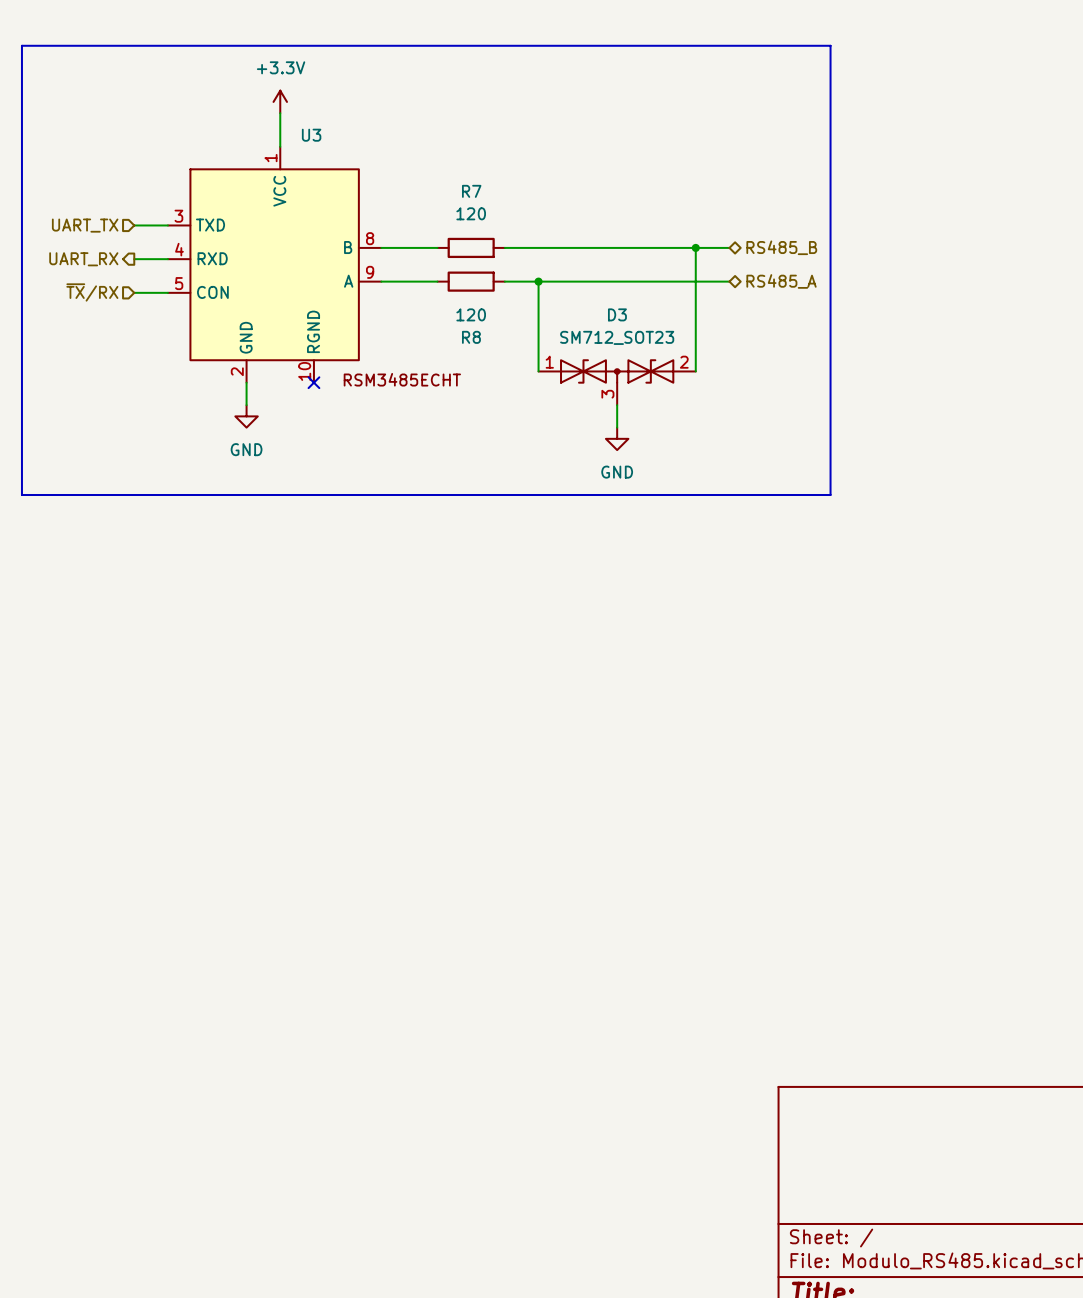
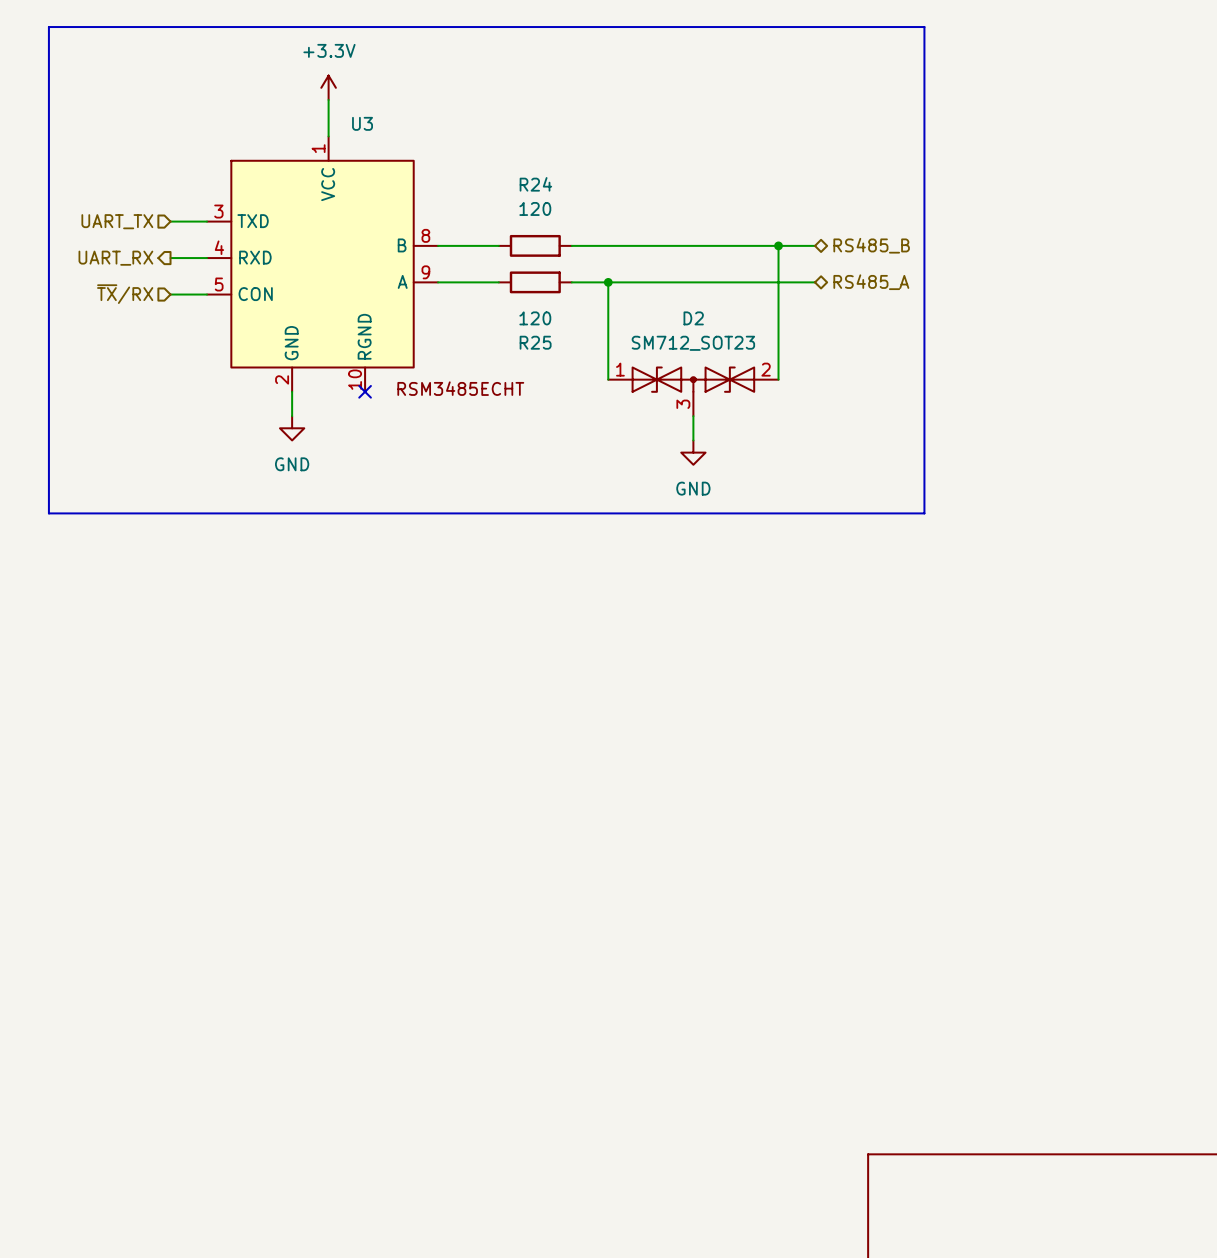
R7 name: R7 (471, 191) -> R24 (535, 184)
D3 name: D3 (617, 314) -> D2 (693, 318)
R8 name: R8 (471, 337) -> R25 (535, 342)

